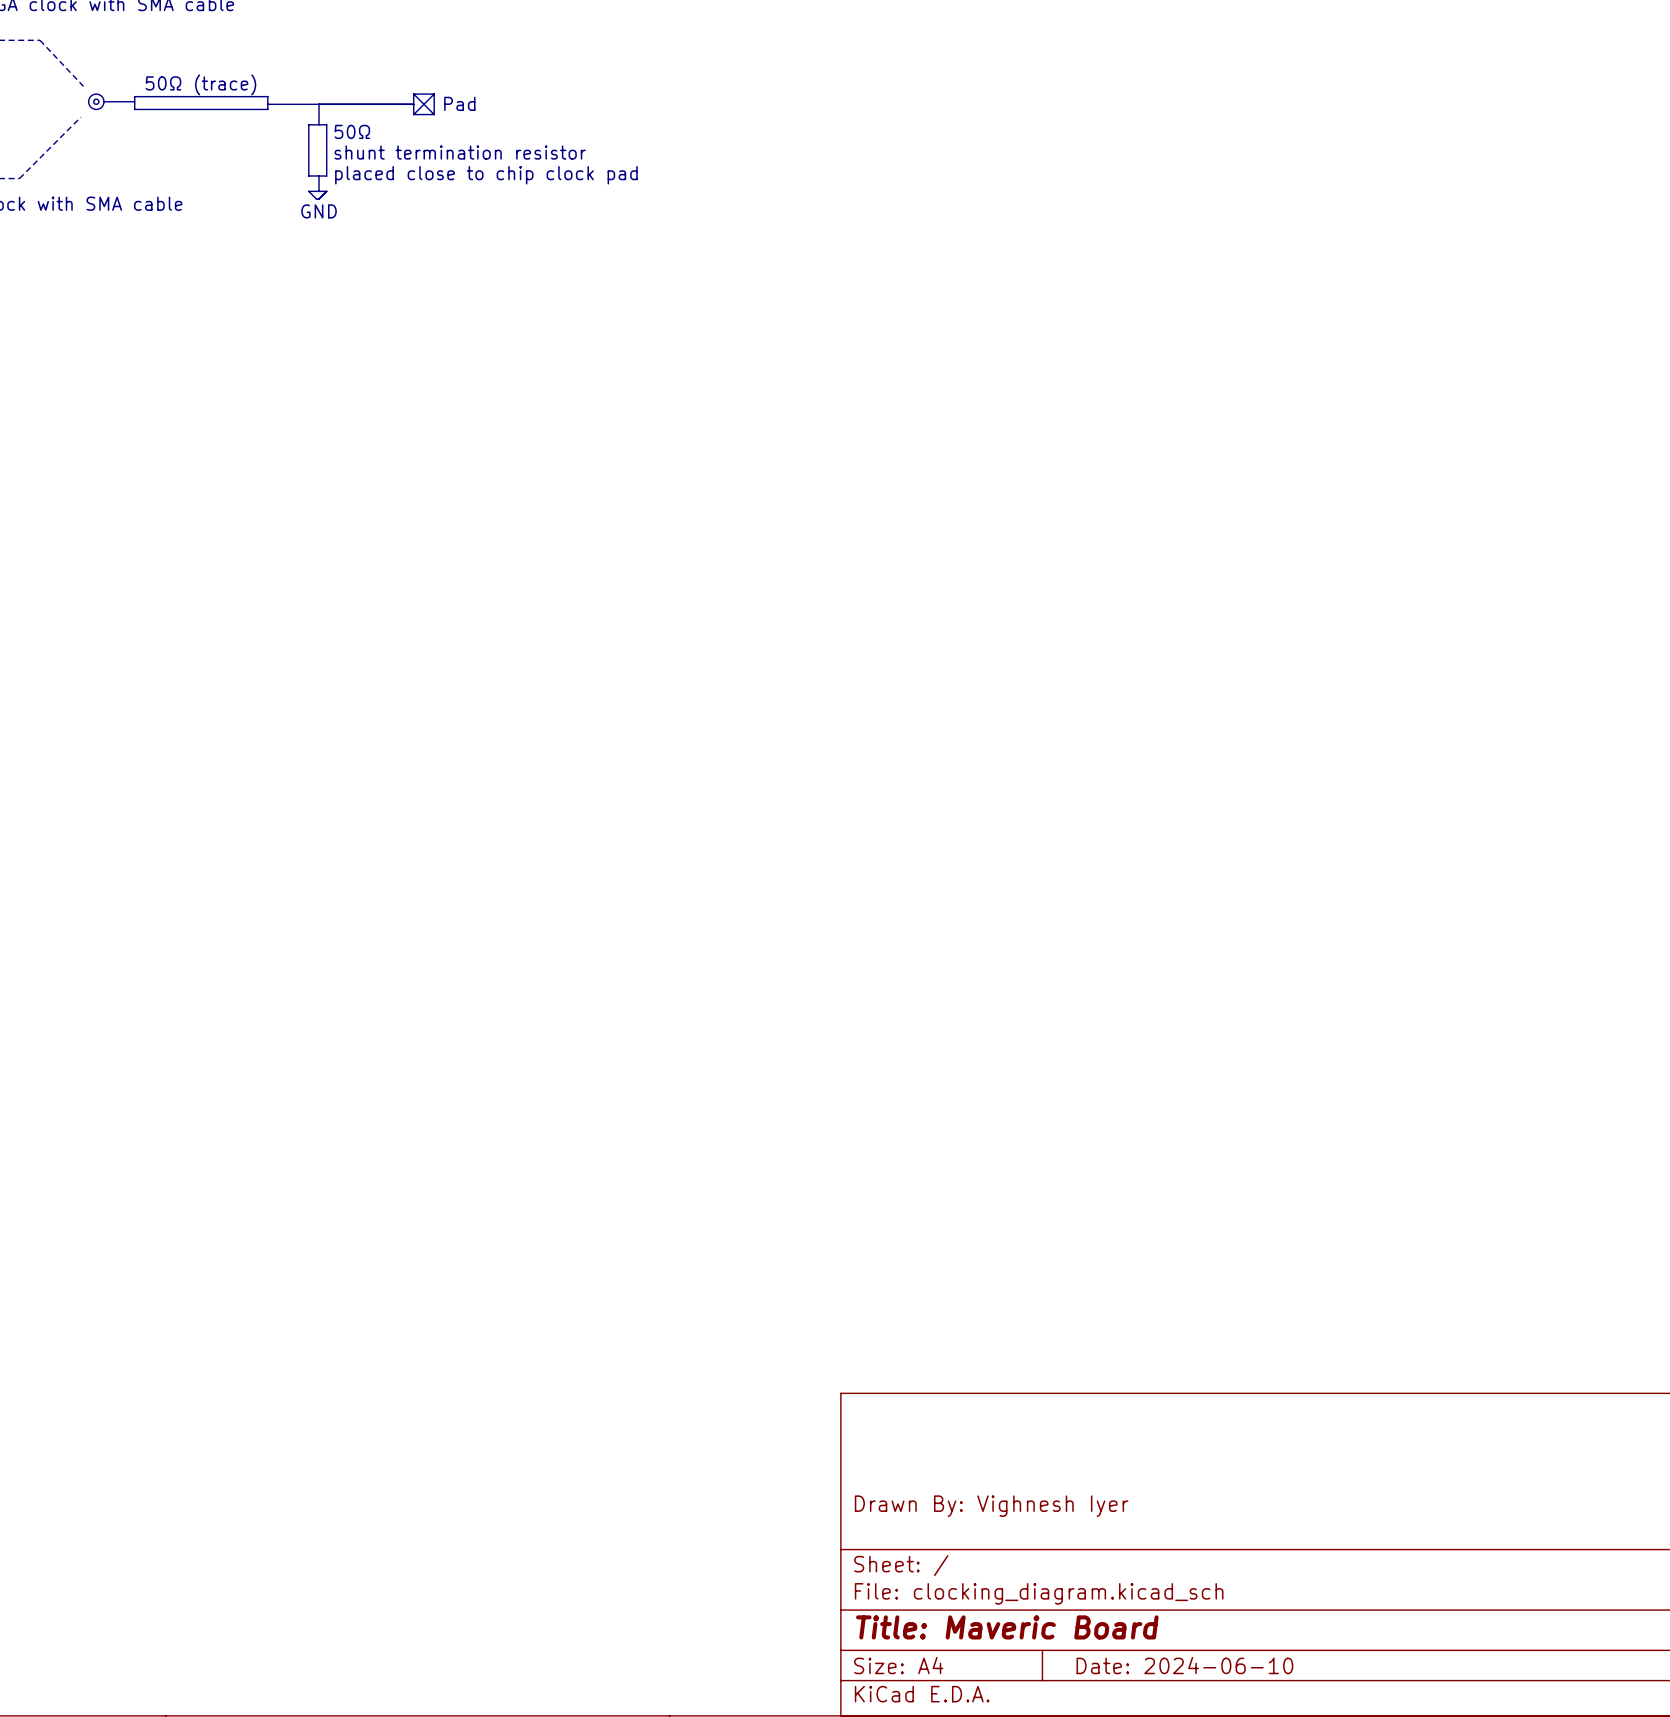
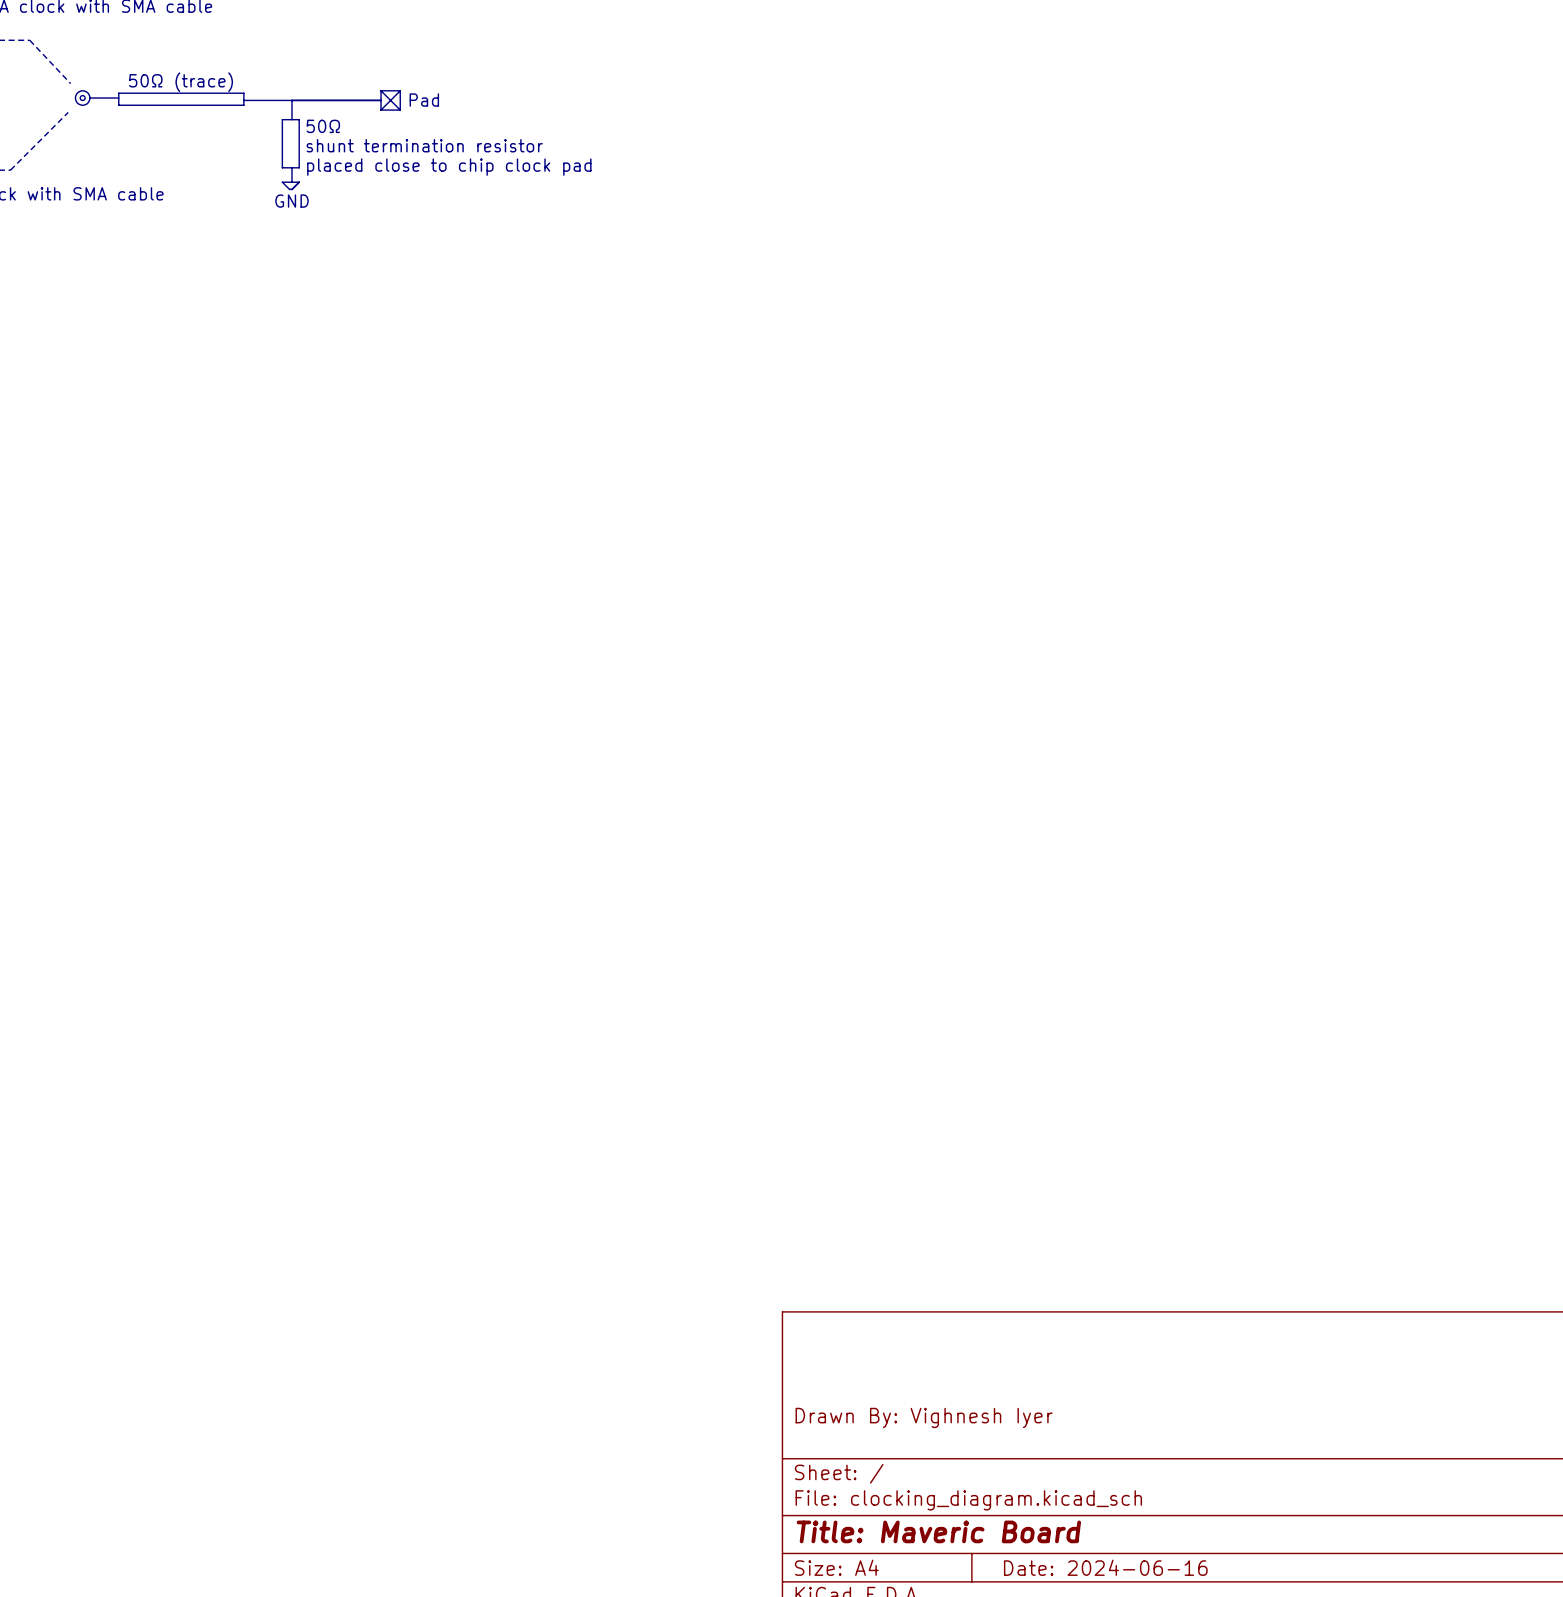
title block: Date: 2024-06-10 (1184, 1665) -> Date: 2024-06-16 (1105, 1567)

